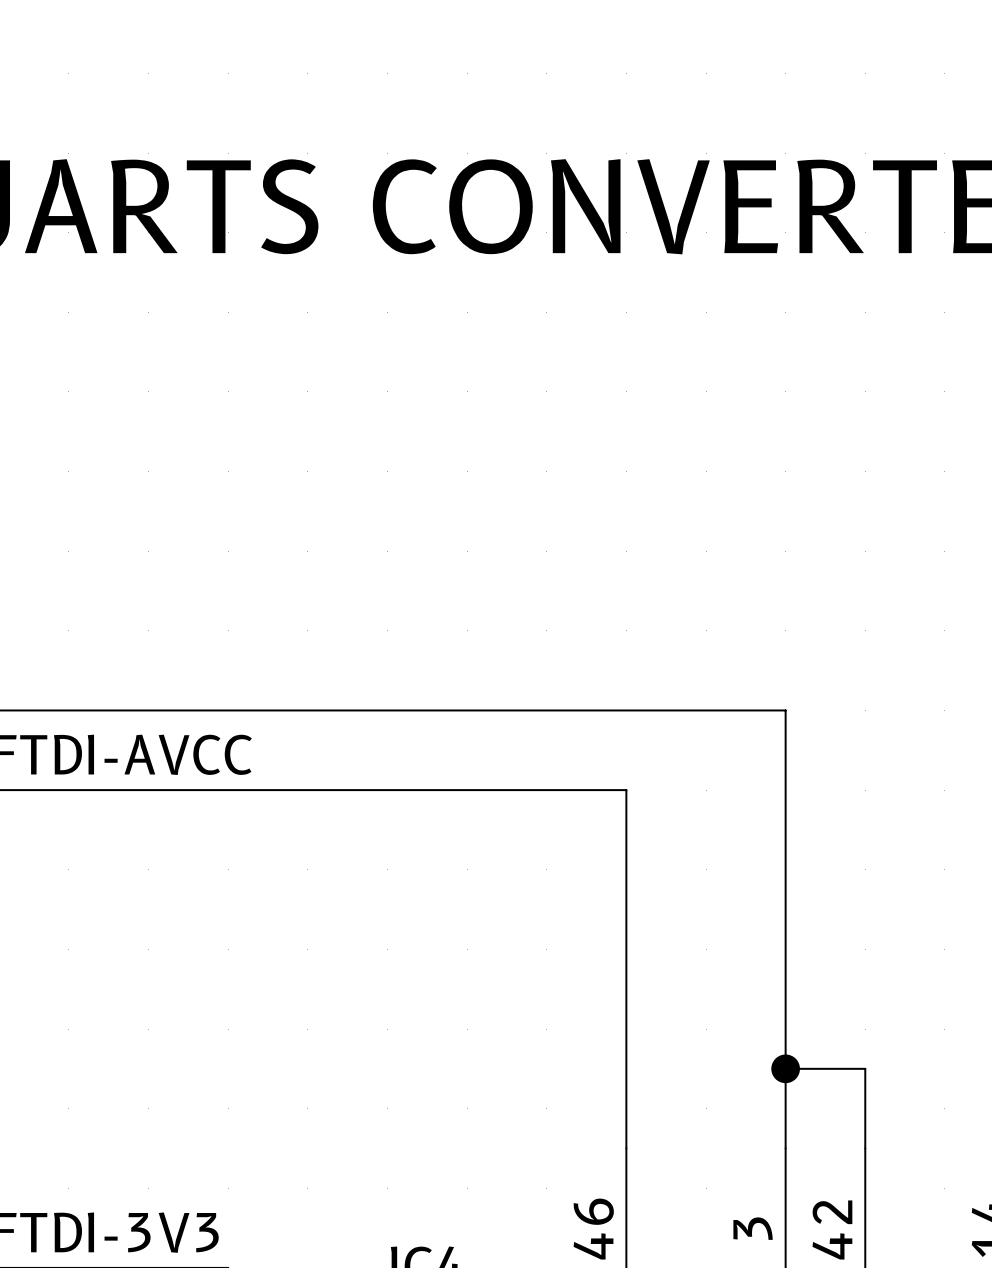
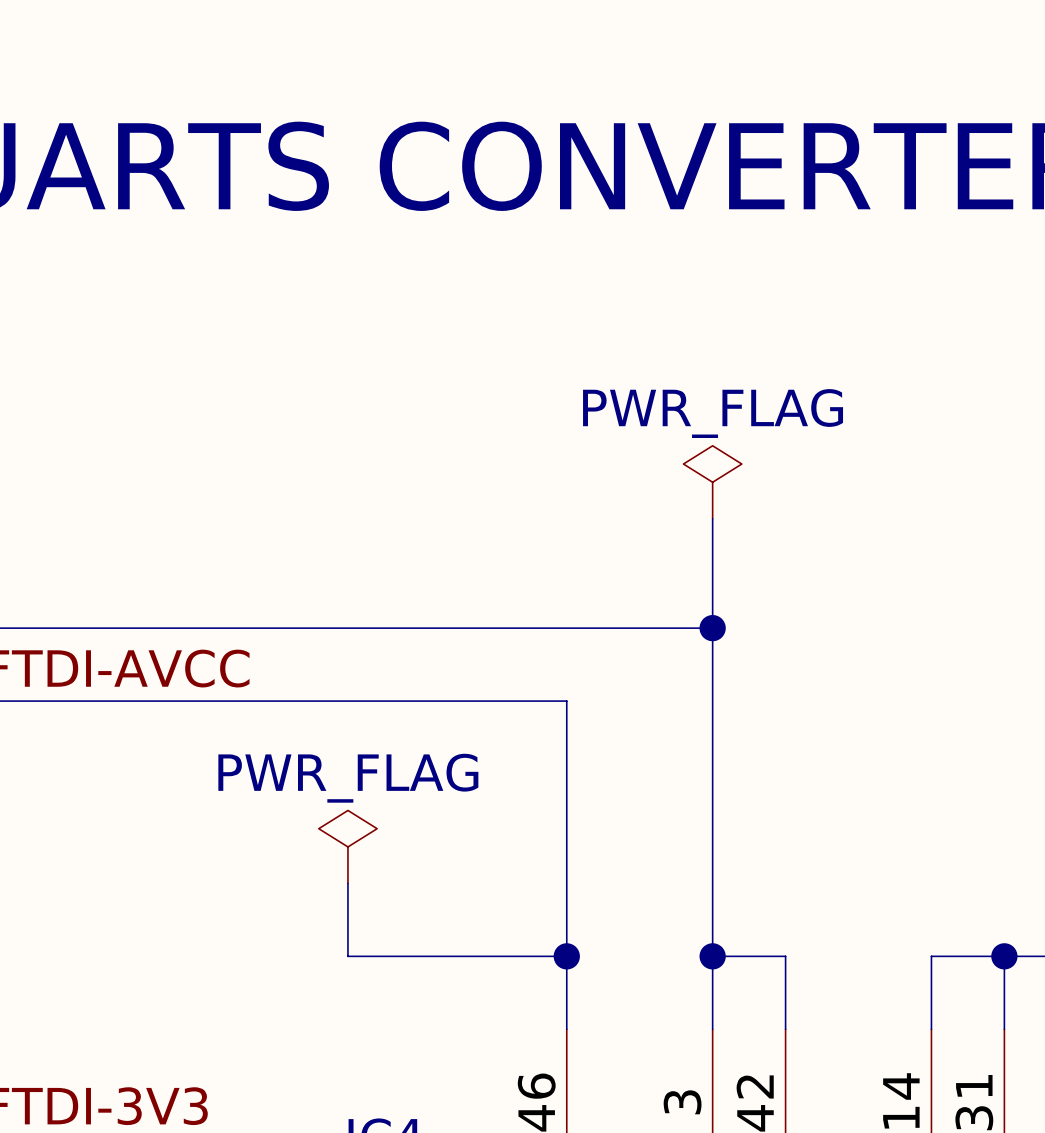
power symbol: none -> PWR_FLAG (712, 482)
wire: none -> (712, 518) (712, 628)
junction: none -> (712, 628)
power symbol: none -> PWR_FLAG (347, 846)
wire: none -> (347, 883) (347, 956) (566, 956)
junction: none -> (566, 956)

